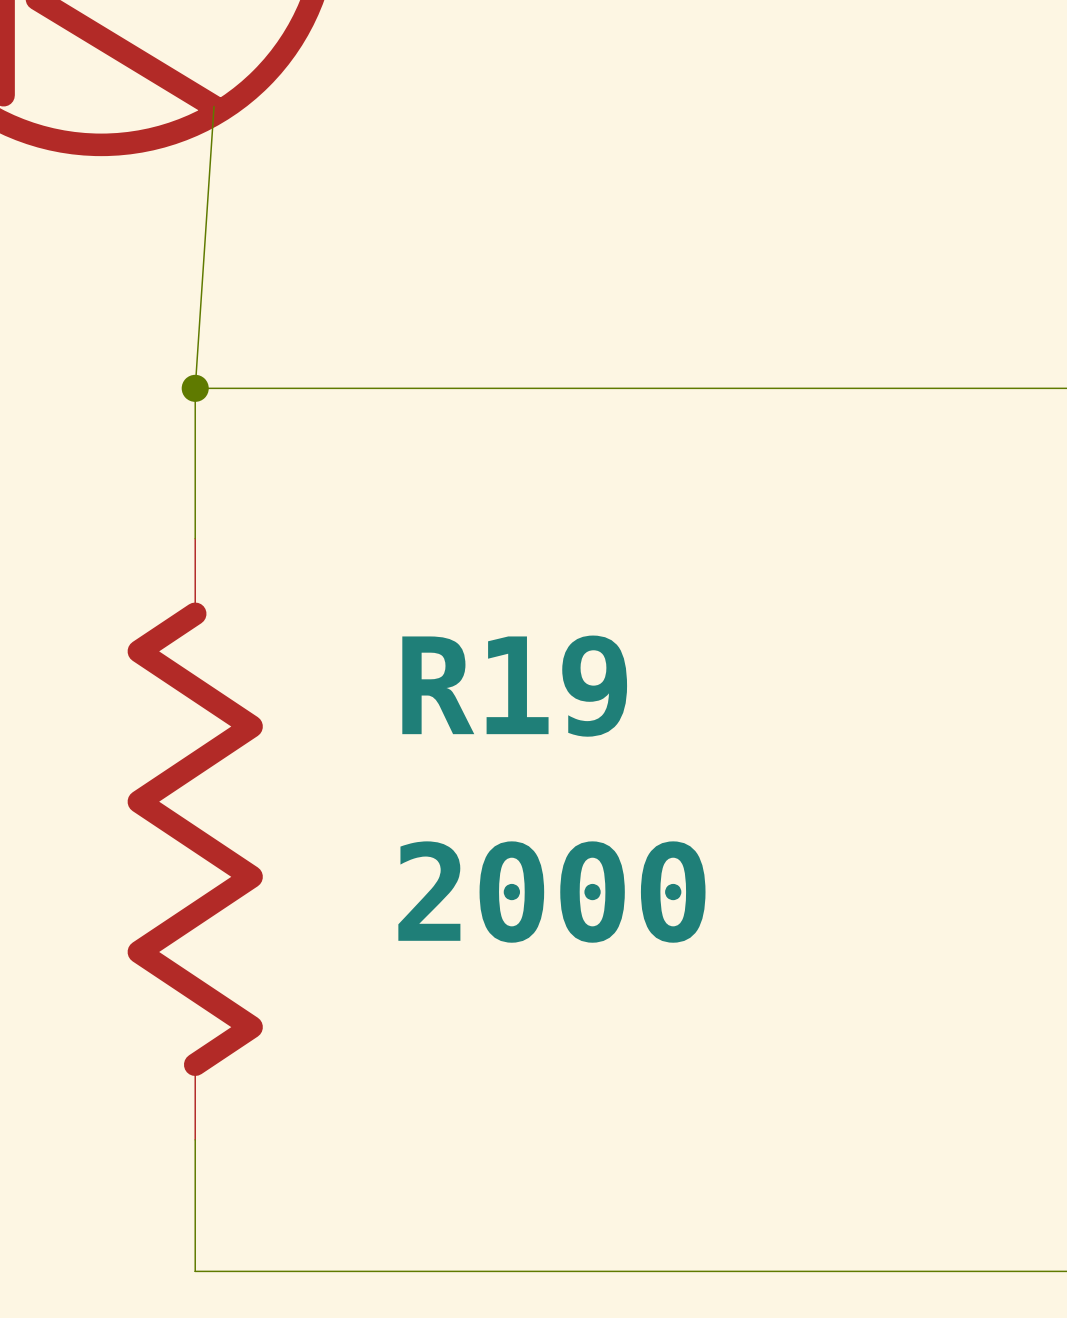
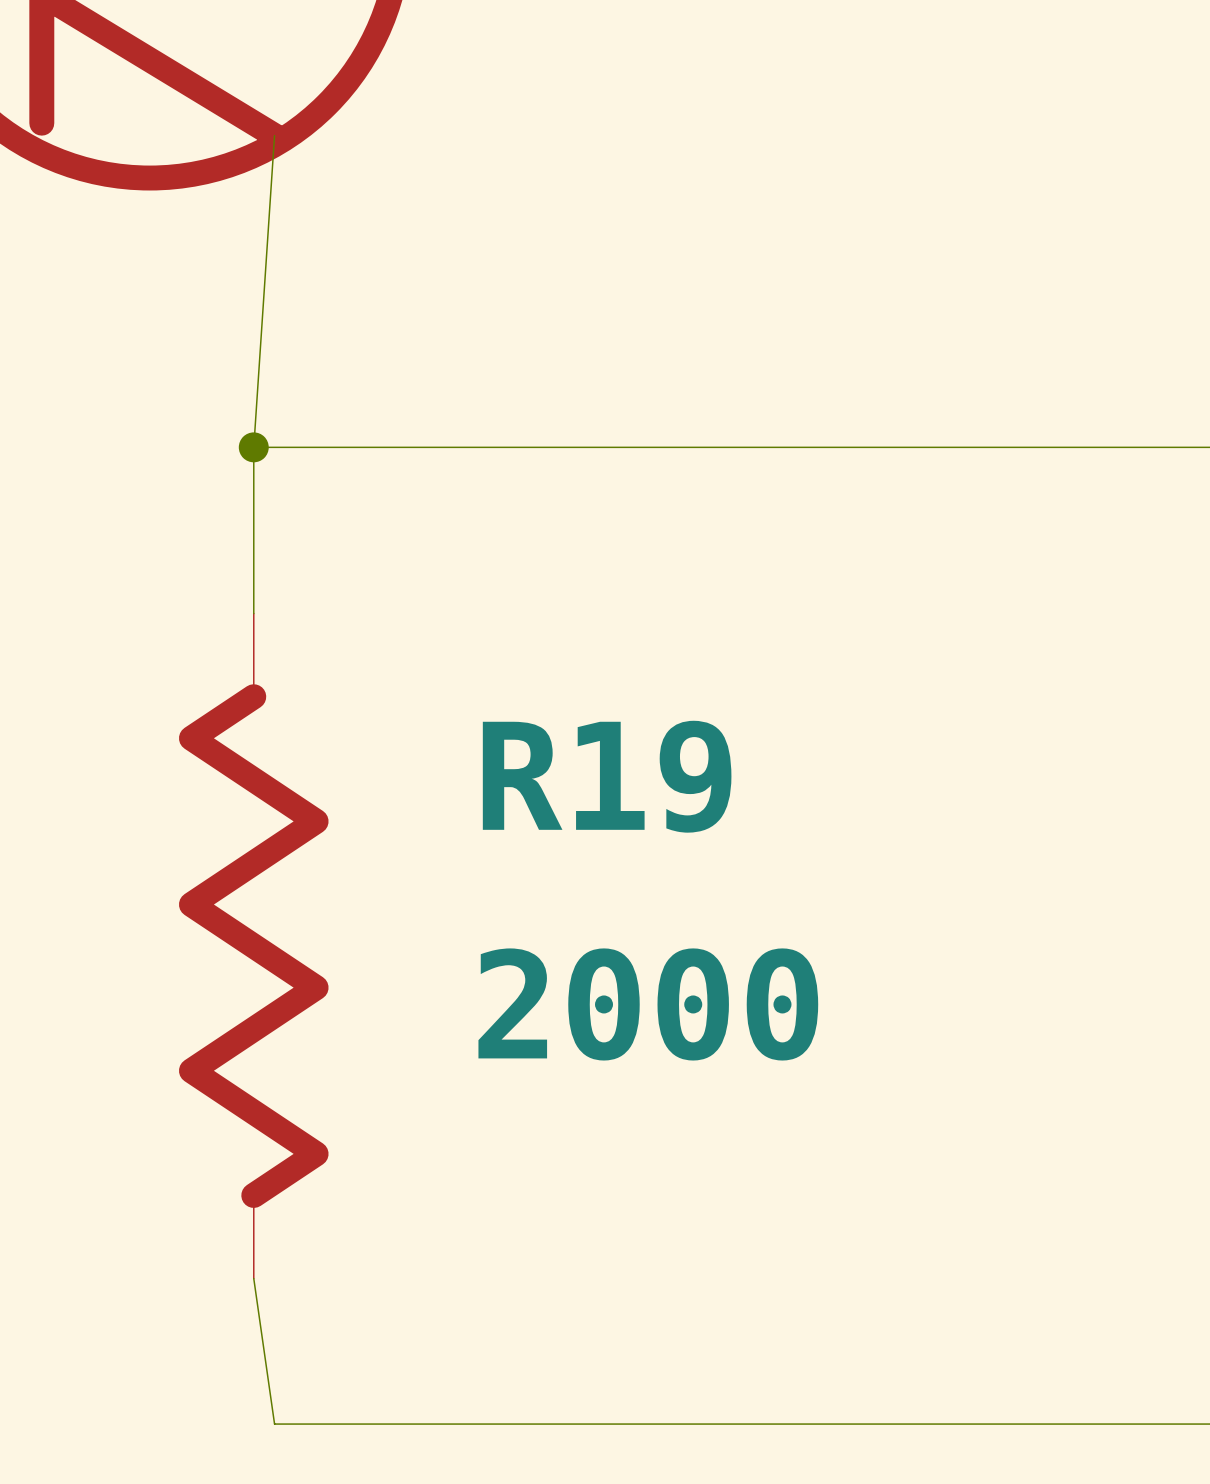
wire: (195, 1139) (195, 1271) (214, 1271) -> (253, 1278) (274, 1424)

